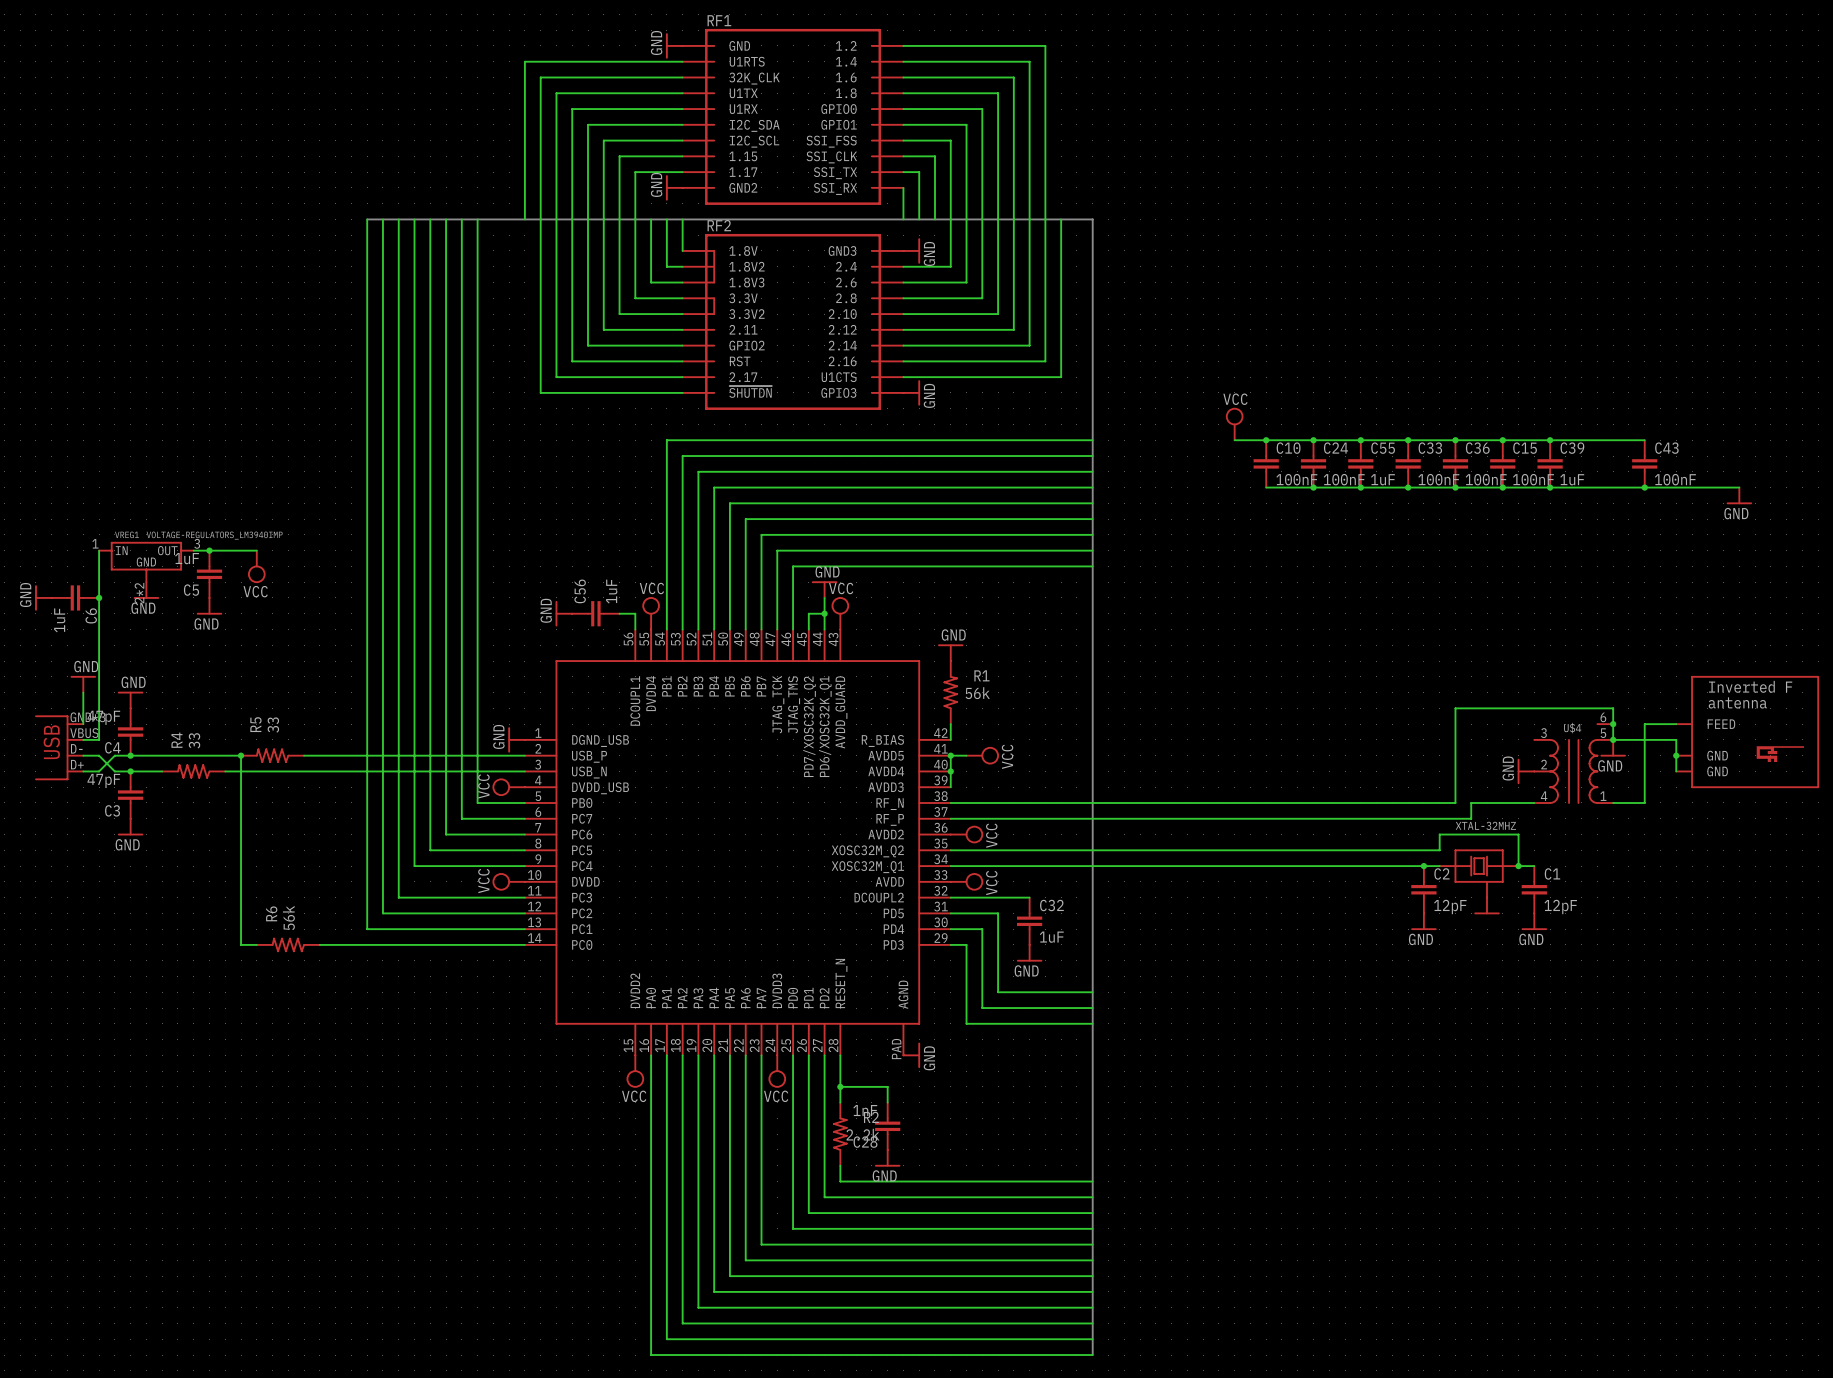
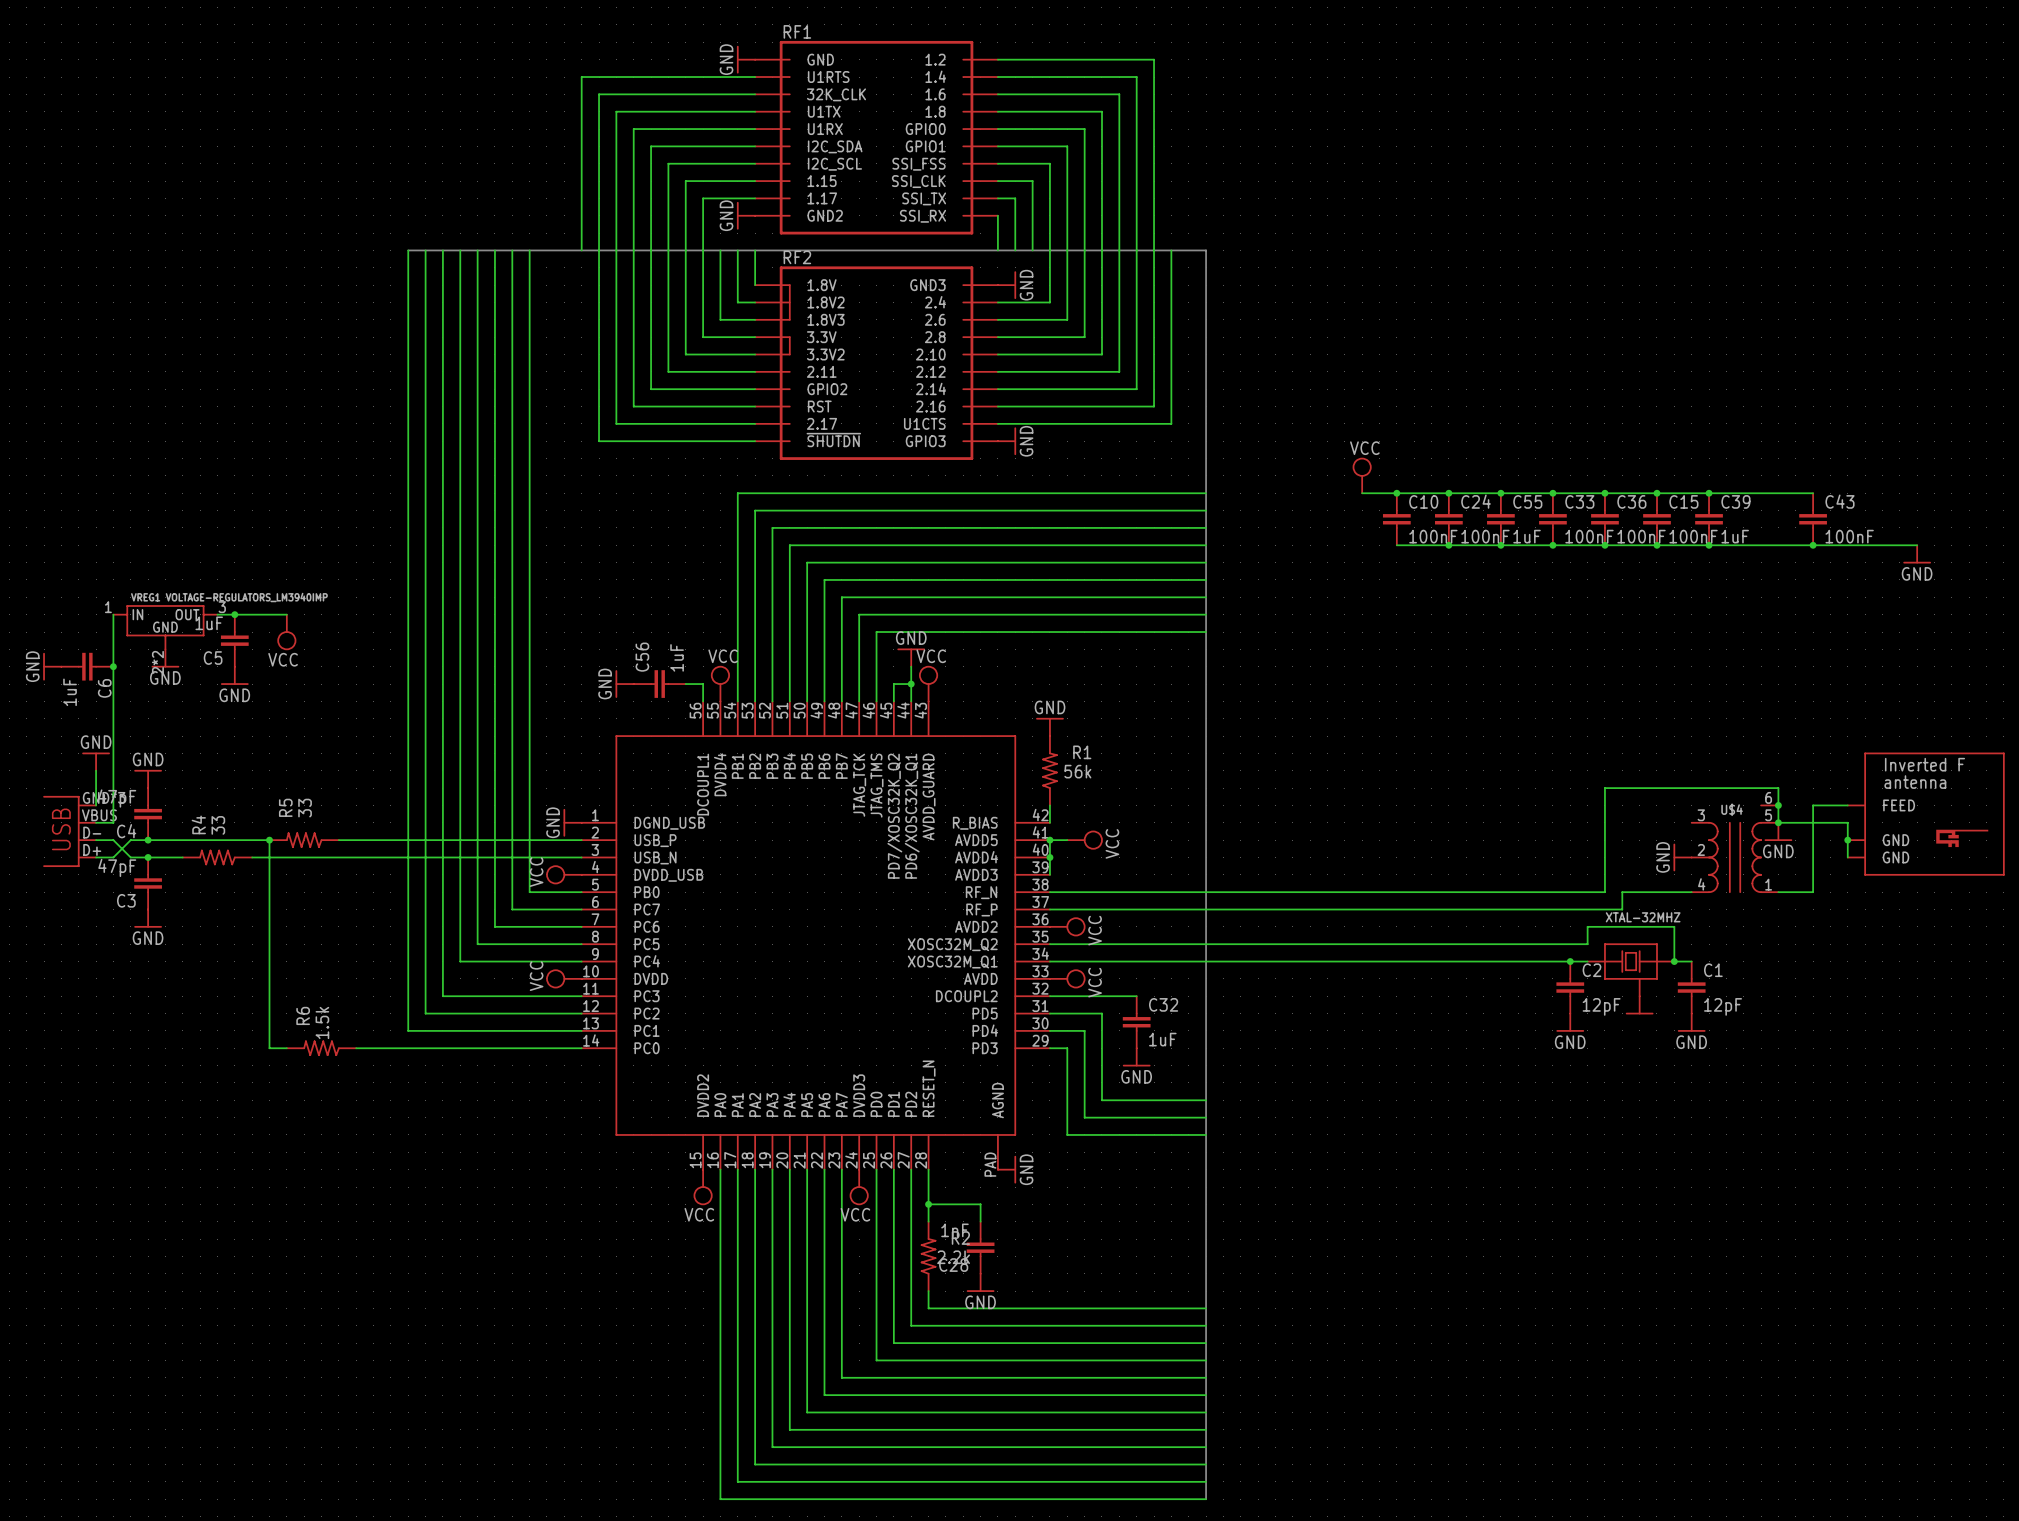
R6 value: 56k (288, 917) -> 1.5k (322, 1022)

